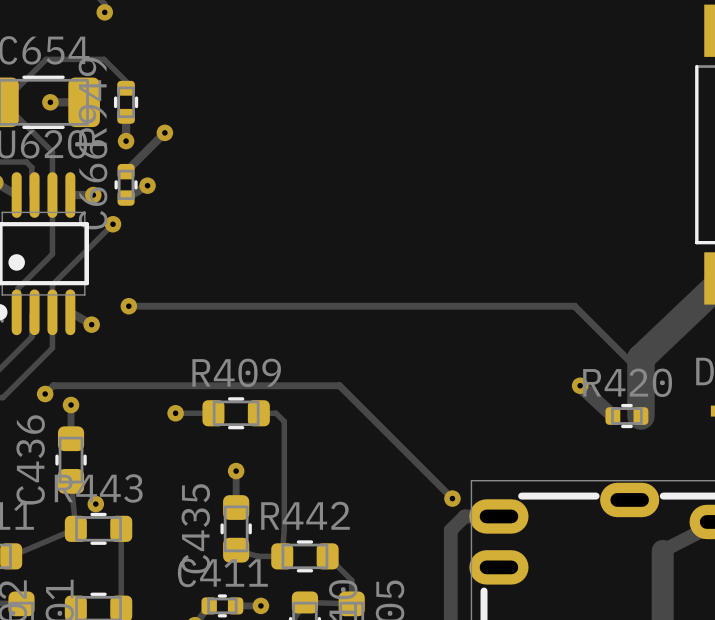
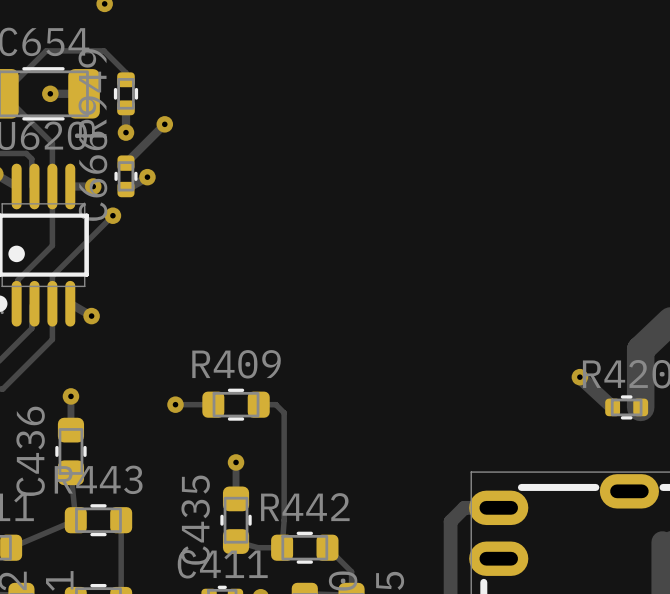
track: (128, 306) (574, 306) (637, 369) -> none
via: (128, 306) -> none
track: (45, 394) (53, 385) (339, 385) (452, 498) -> none
via: (45, 394) -> none
via: (452, 498) -> none
via: (95, 504) -> none

